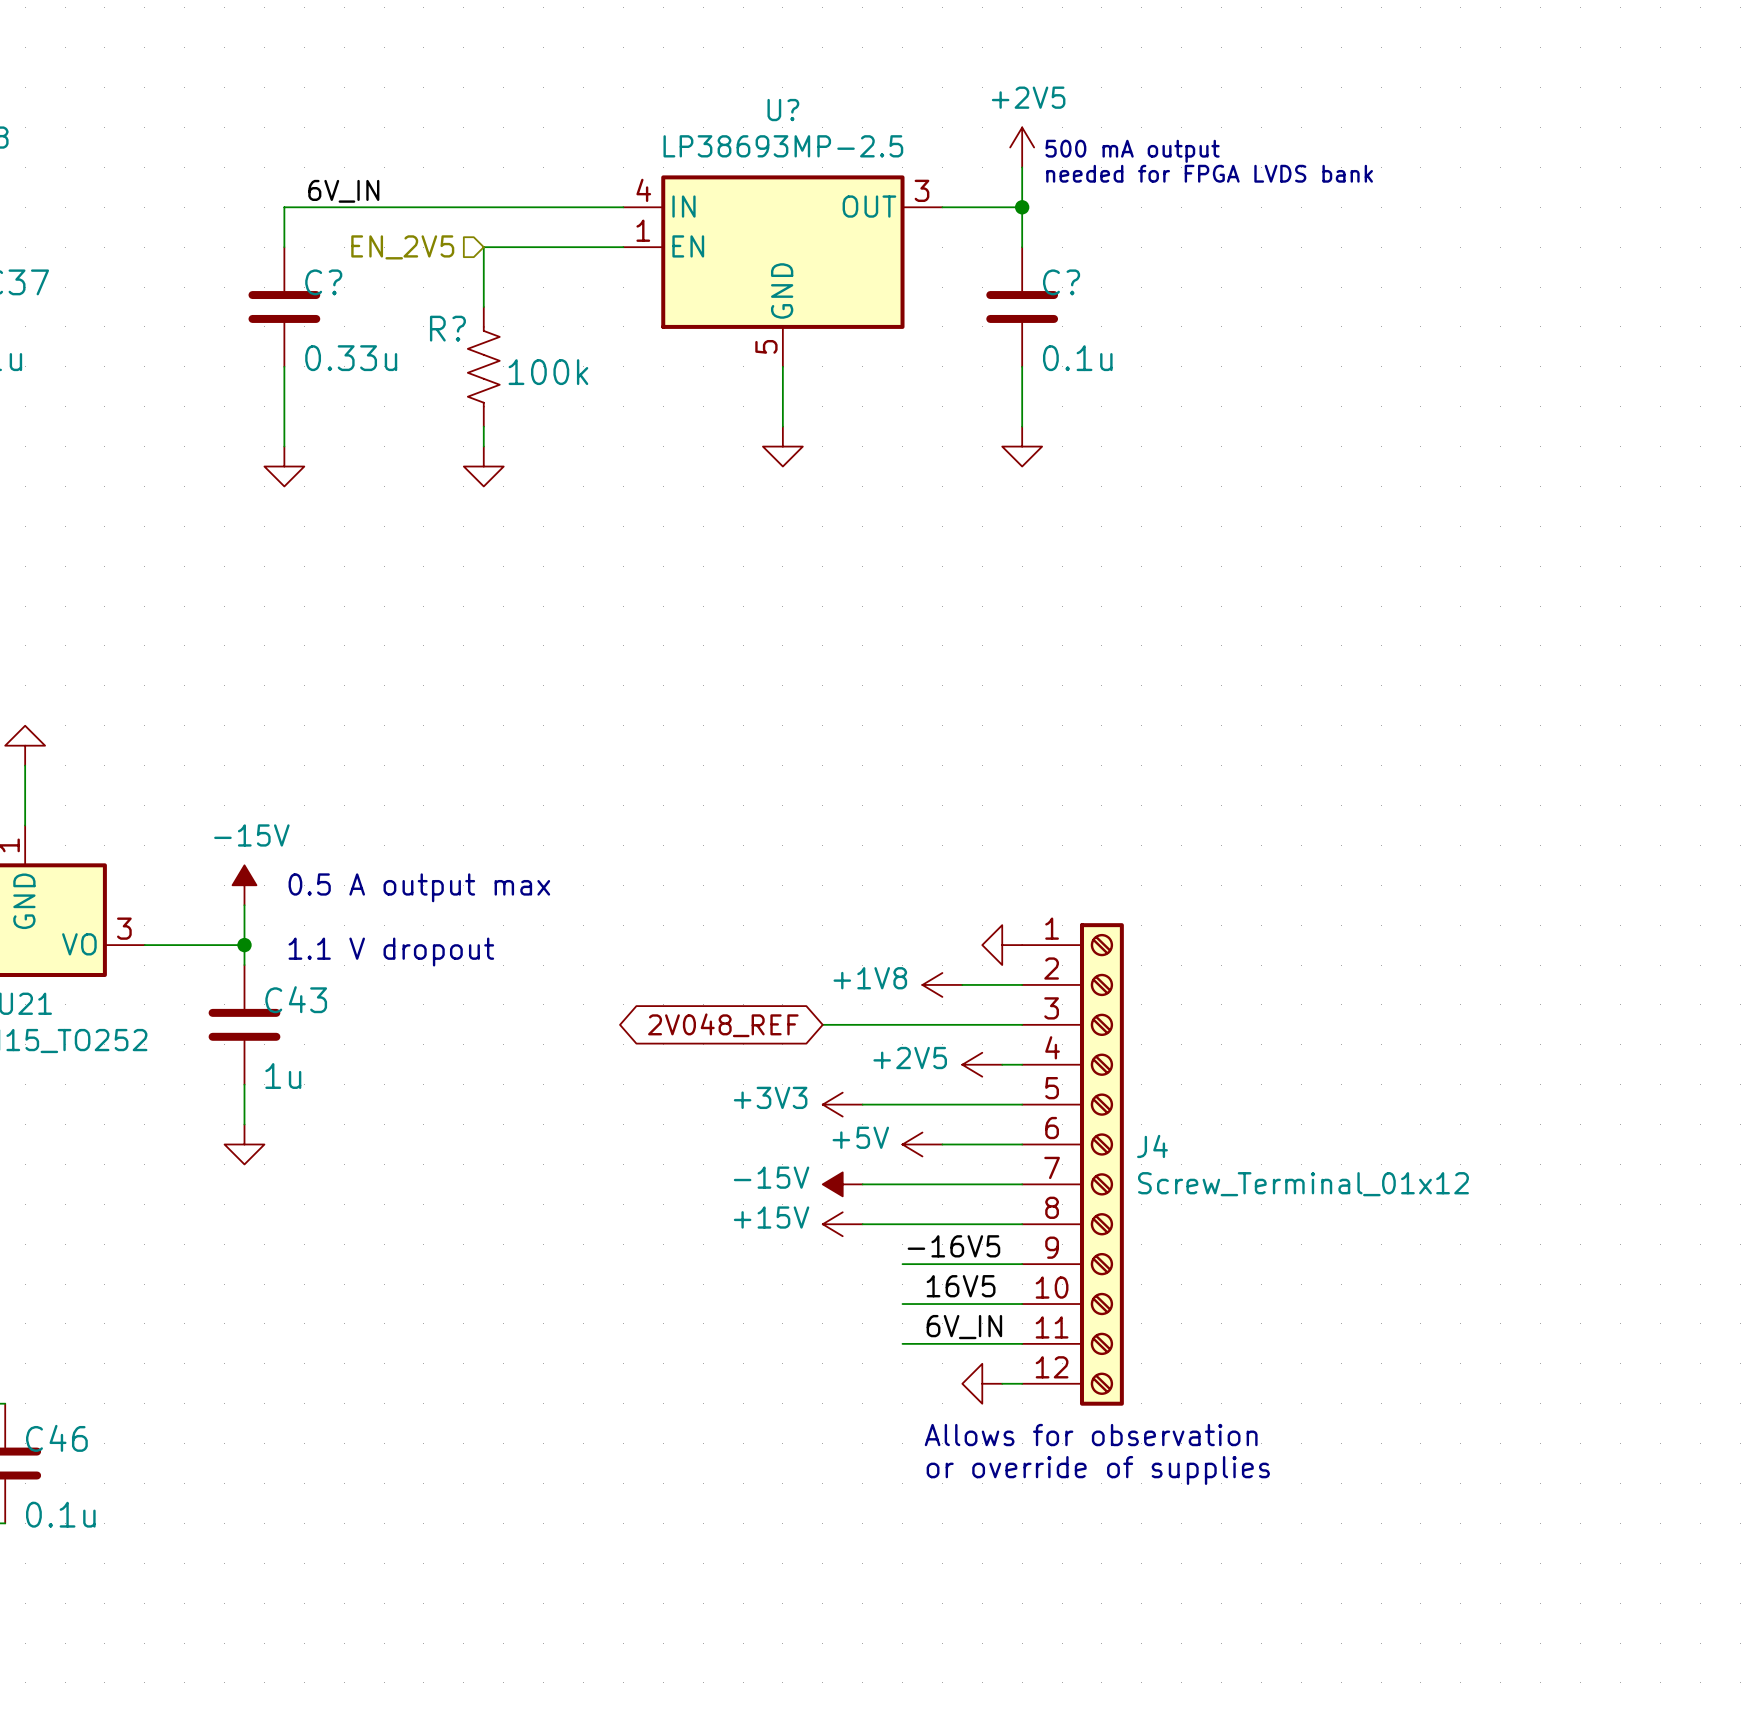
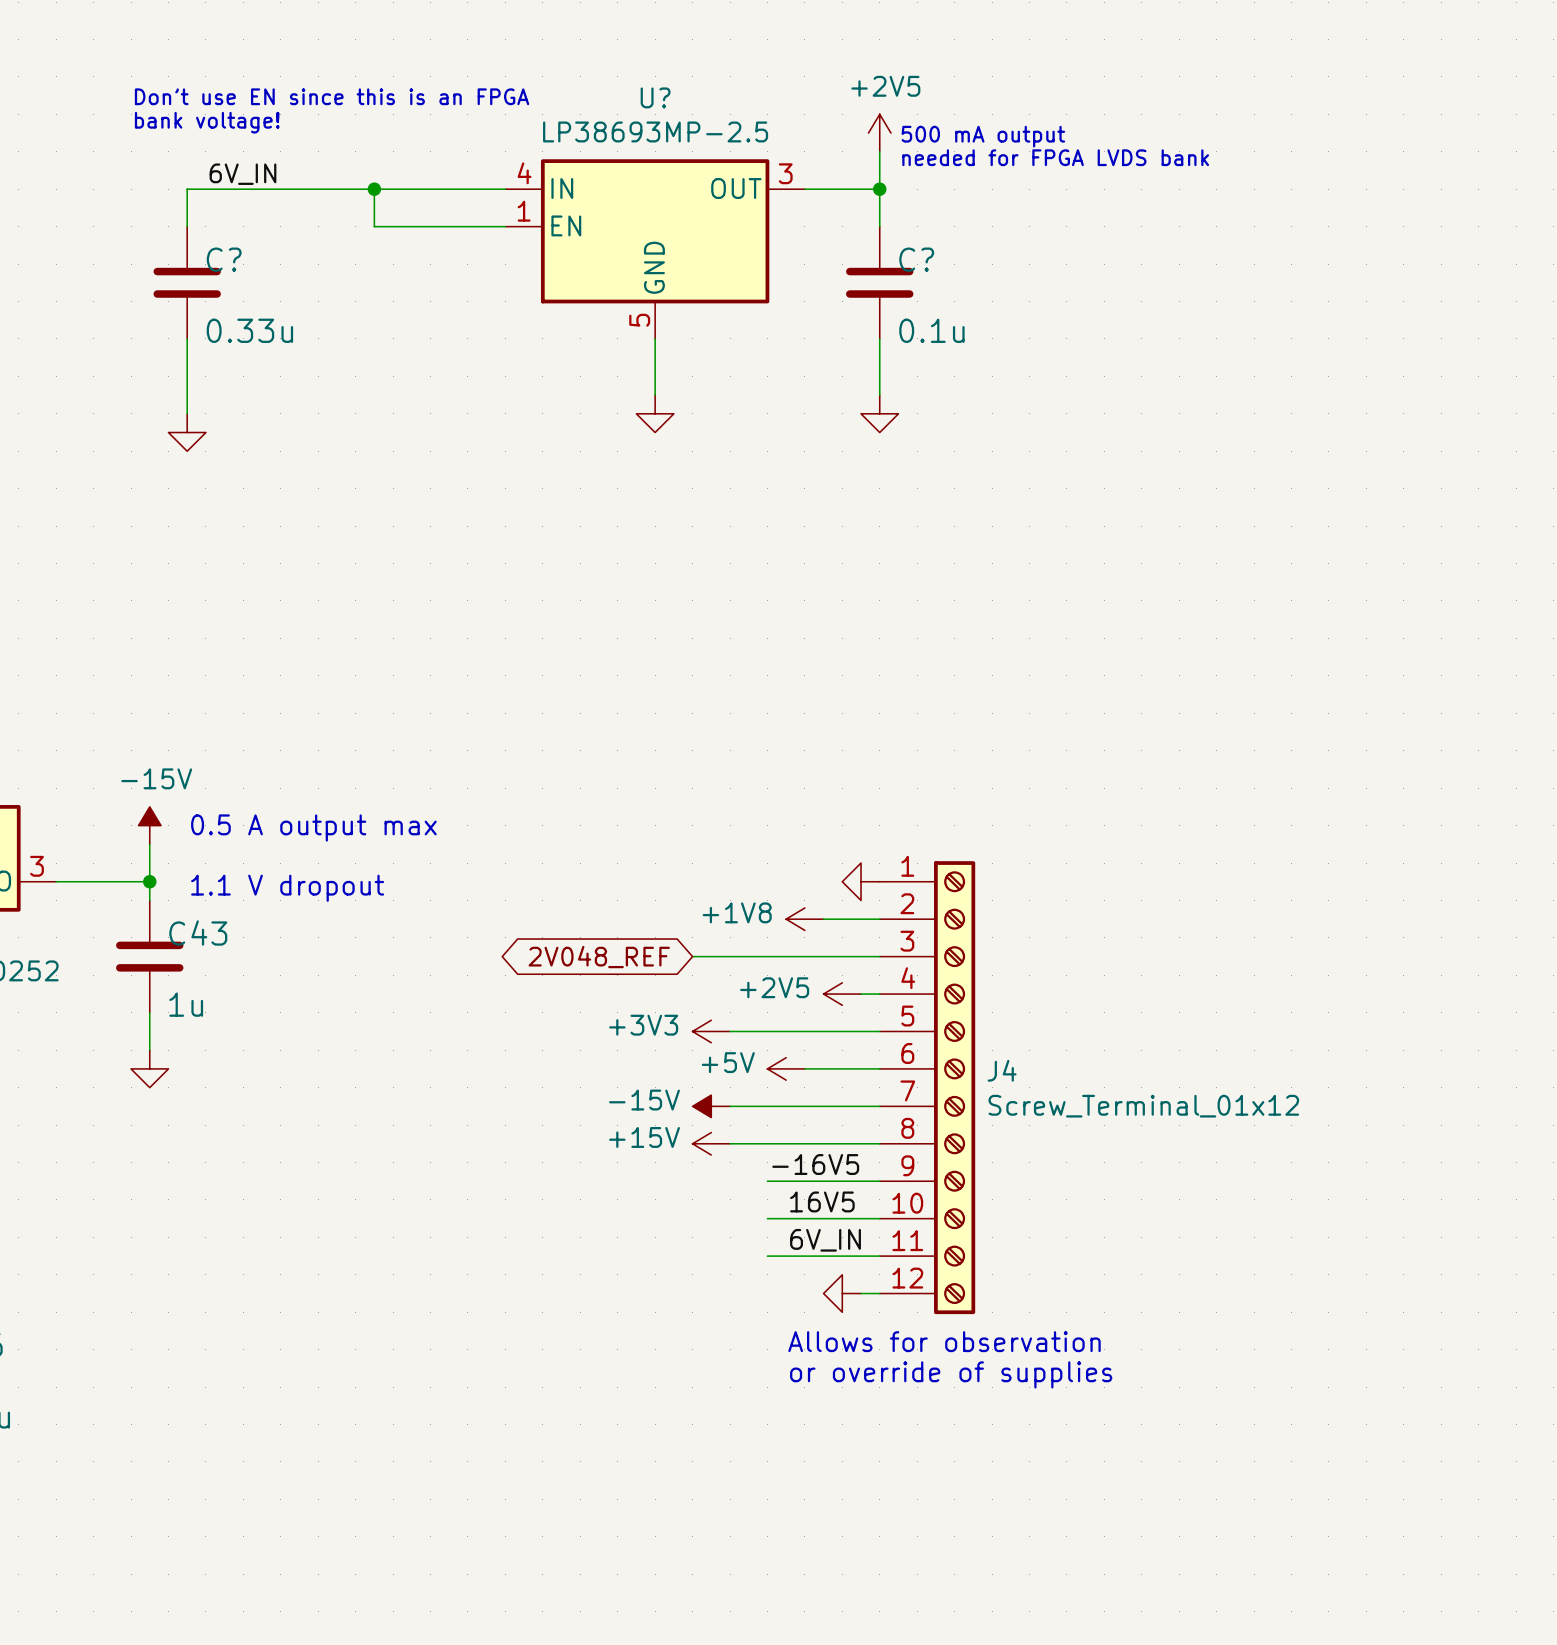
text: none -> Don’t use EN since this is an FPGA (332, 96)
text: none -> bank voltage! (207, 122)
junction: none -> (374, 189)
hierarchical label: EN_2V5 (402, 247) -> none
wire: (483, 247) (483, 306) -> (374, 226) (374, 189)
R?: 100k (483, 366) -> none
wire: (483, 426) (483, 446) -> none
power symbol: (483, 466) -> none

